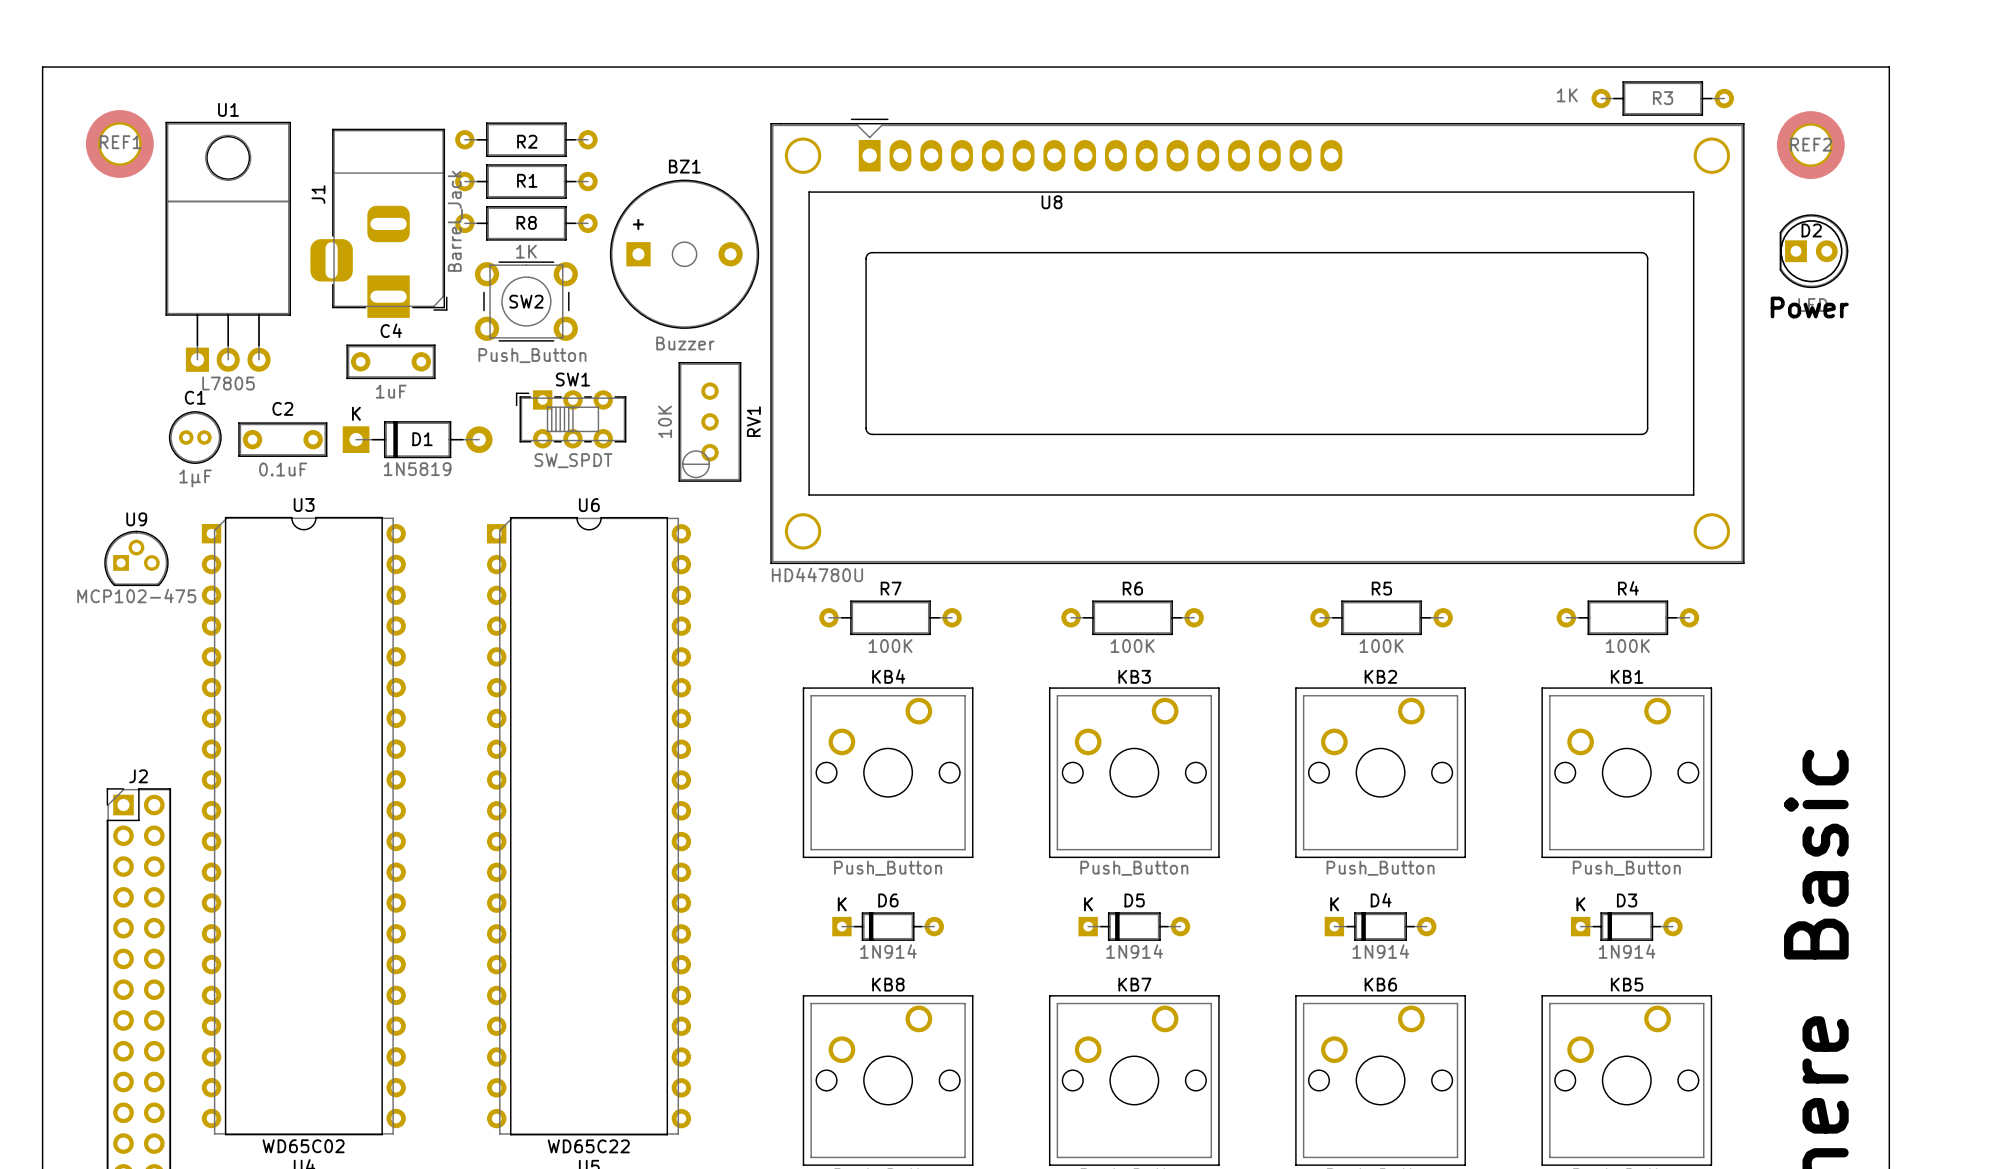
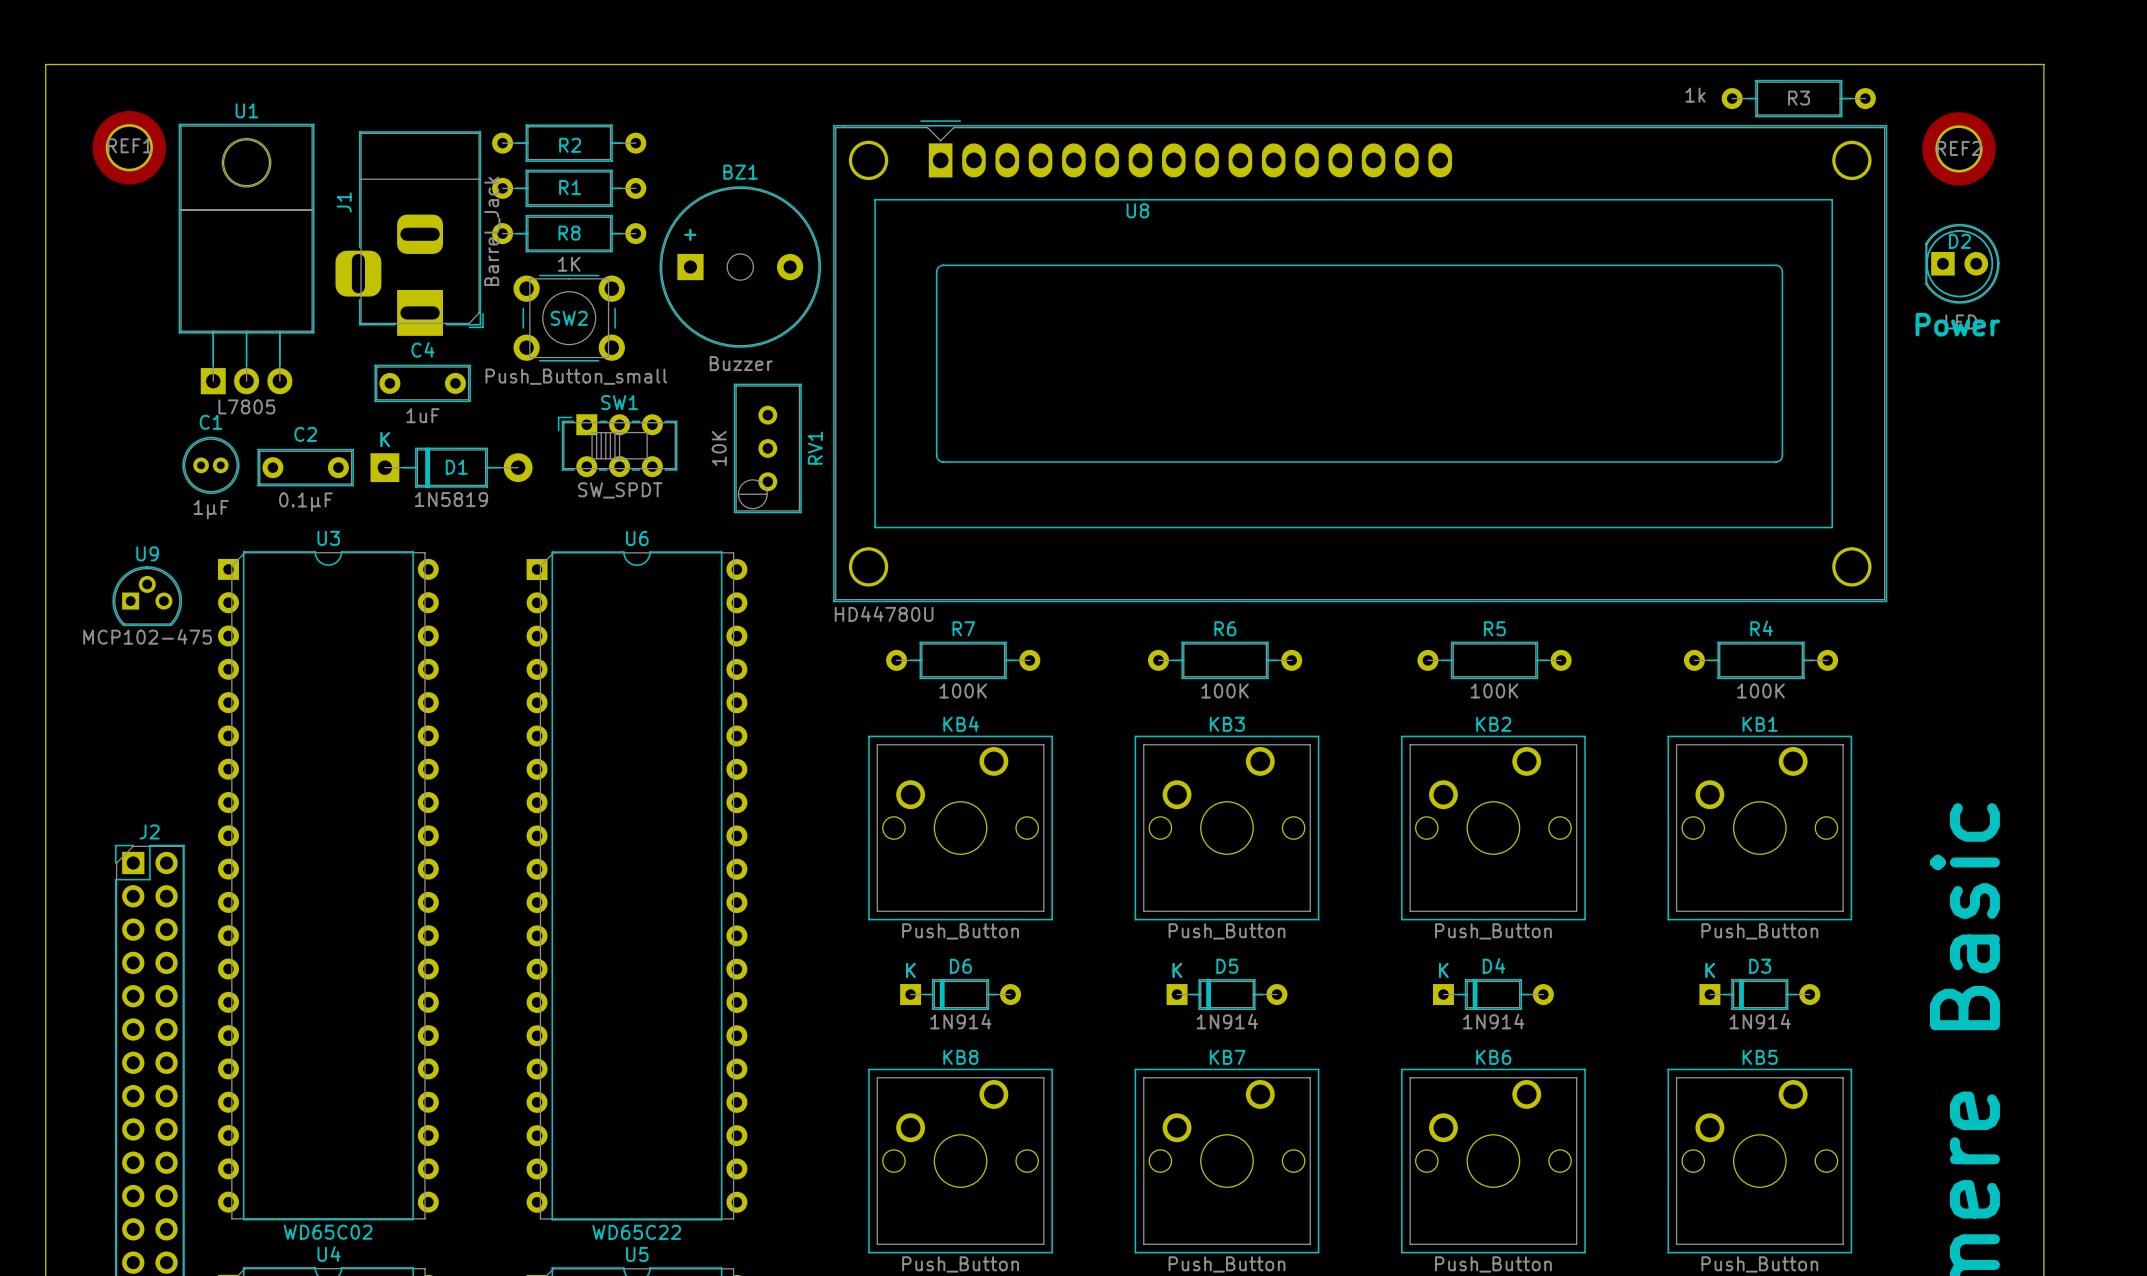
R3 value: 1K (1567, 95) -> 1k (1695, 95)
SW2 value: Push_Button (532, 355) -> Push_Button_small (576, 376)
C2 value: 0.1uF (283, 469) -> 0.1µF (305, 502)

